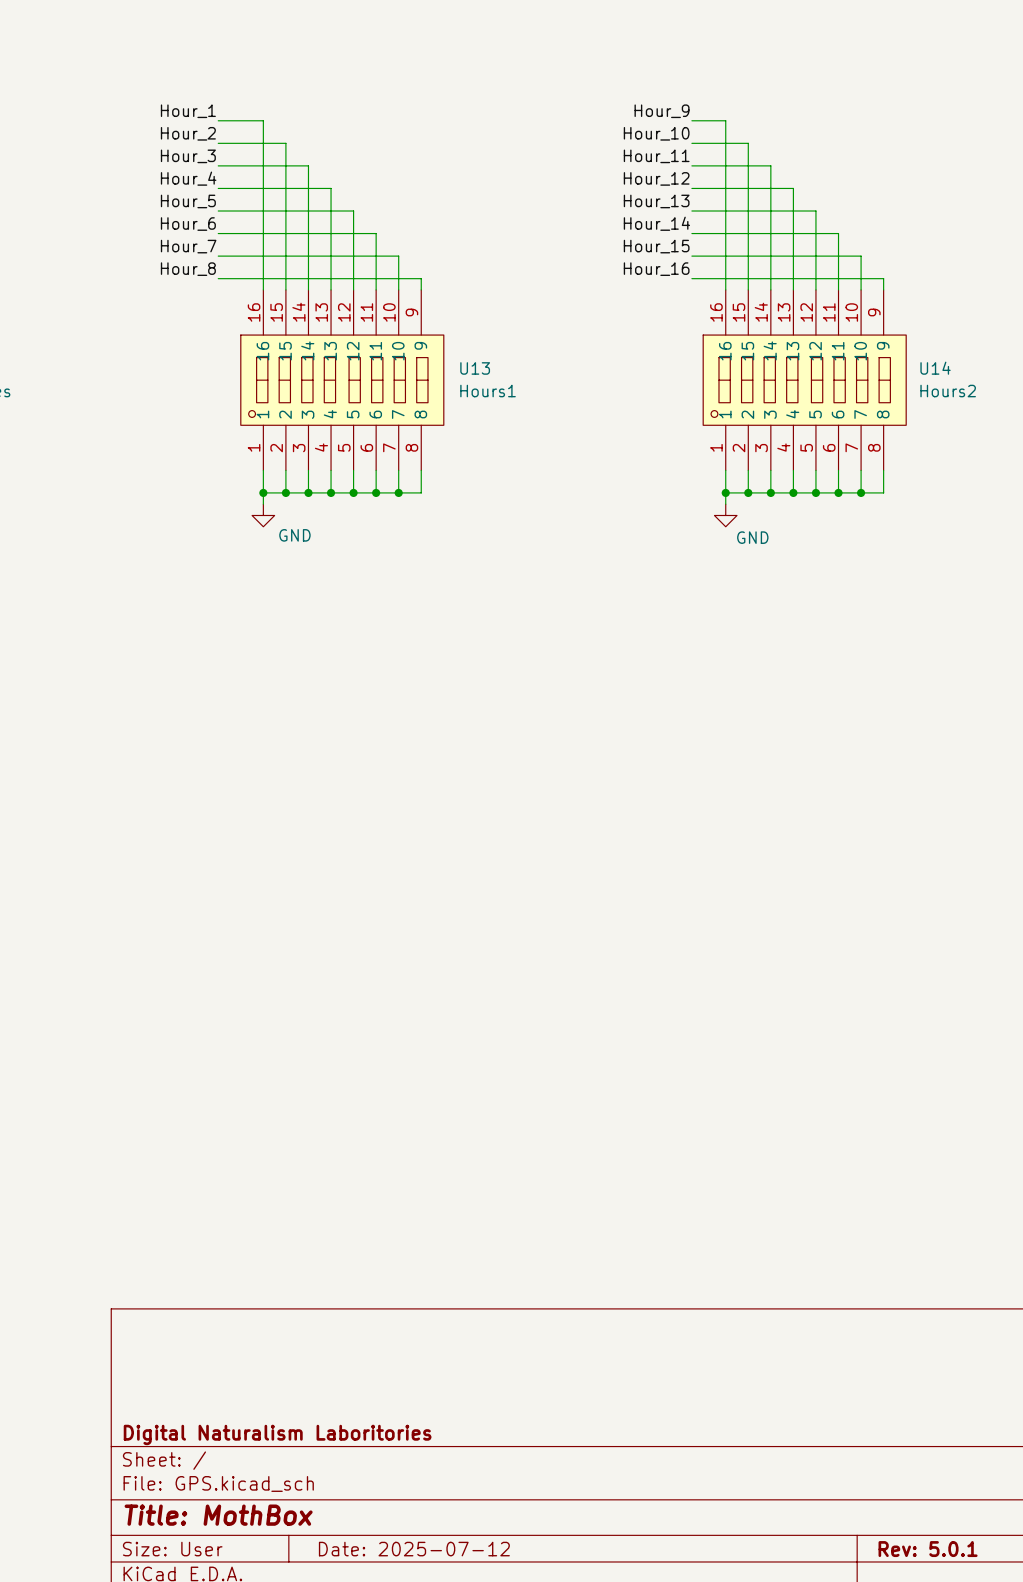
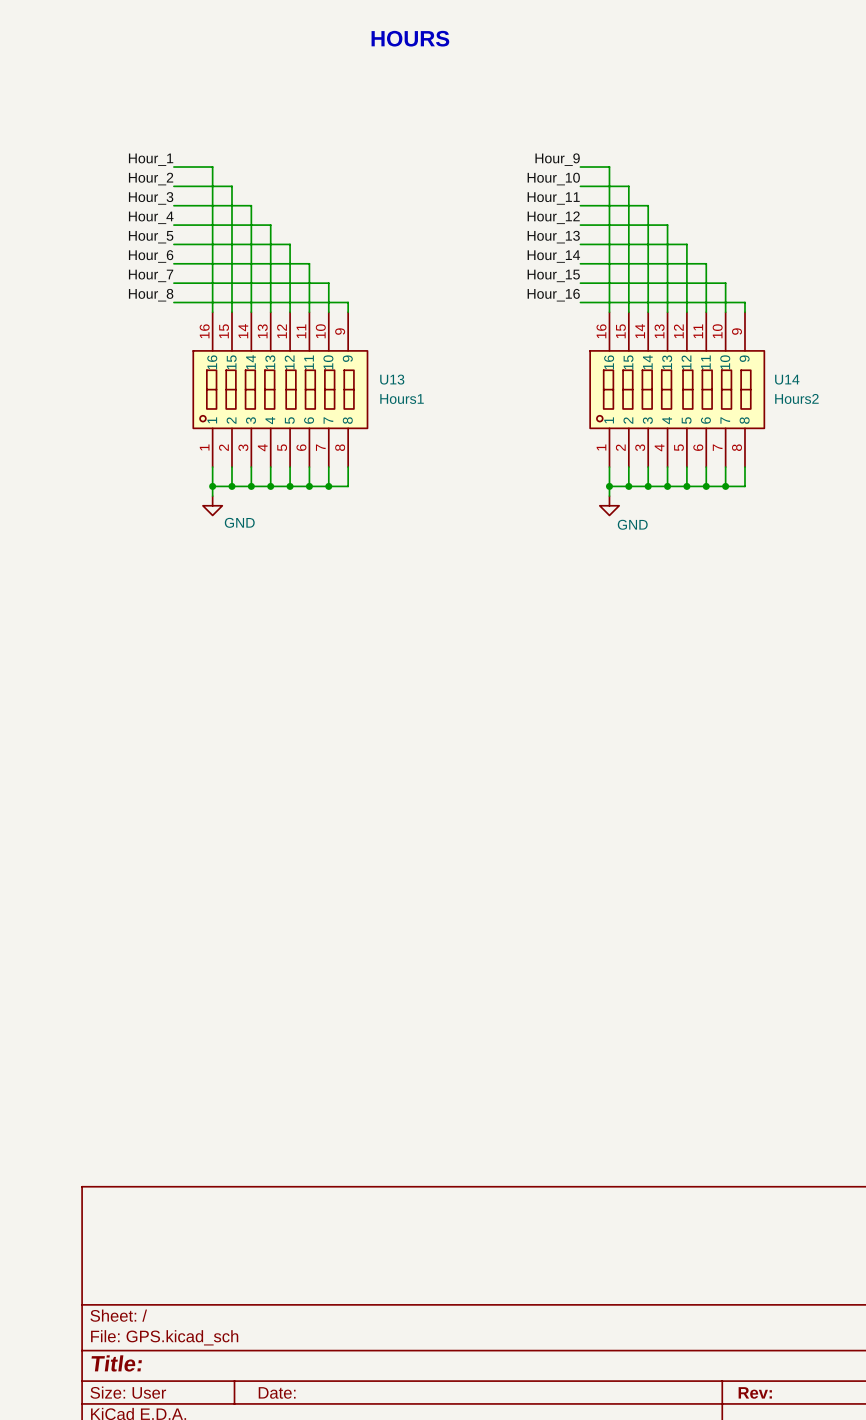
title block: Digital Naturalism Laboritories (277, 1434) -> none
title block: Title: MothBox (218, 1515) -> Title: (116, 1363)
title block: Date: 2025-07-12 (414, 1549) -> Date: (277, 1392)
title block: Rev: 5.0.1 (928, 1549) -> Rev: (755, 1392)

